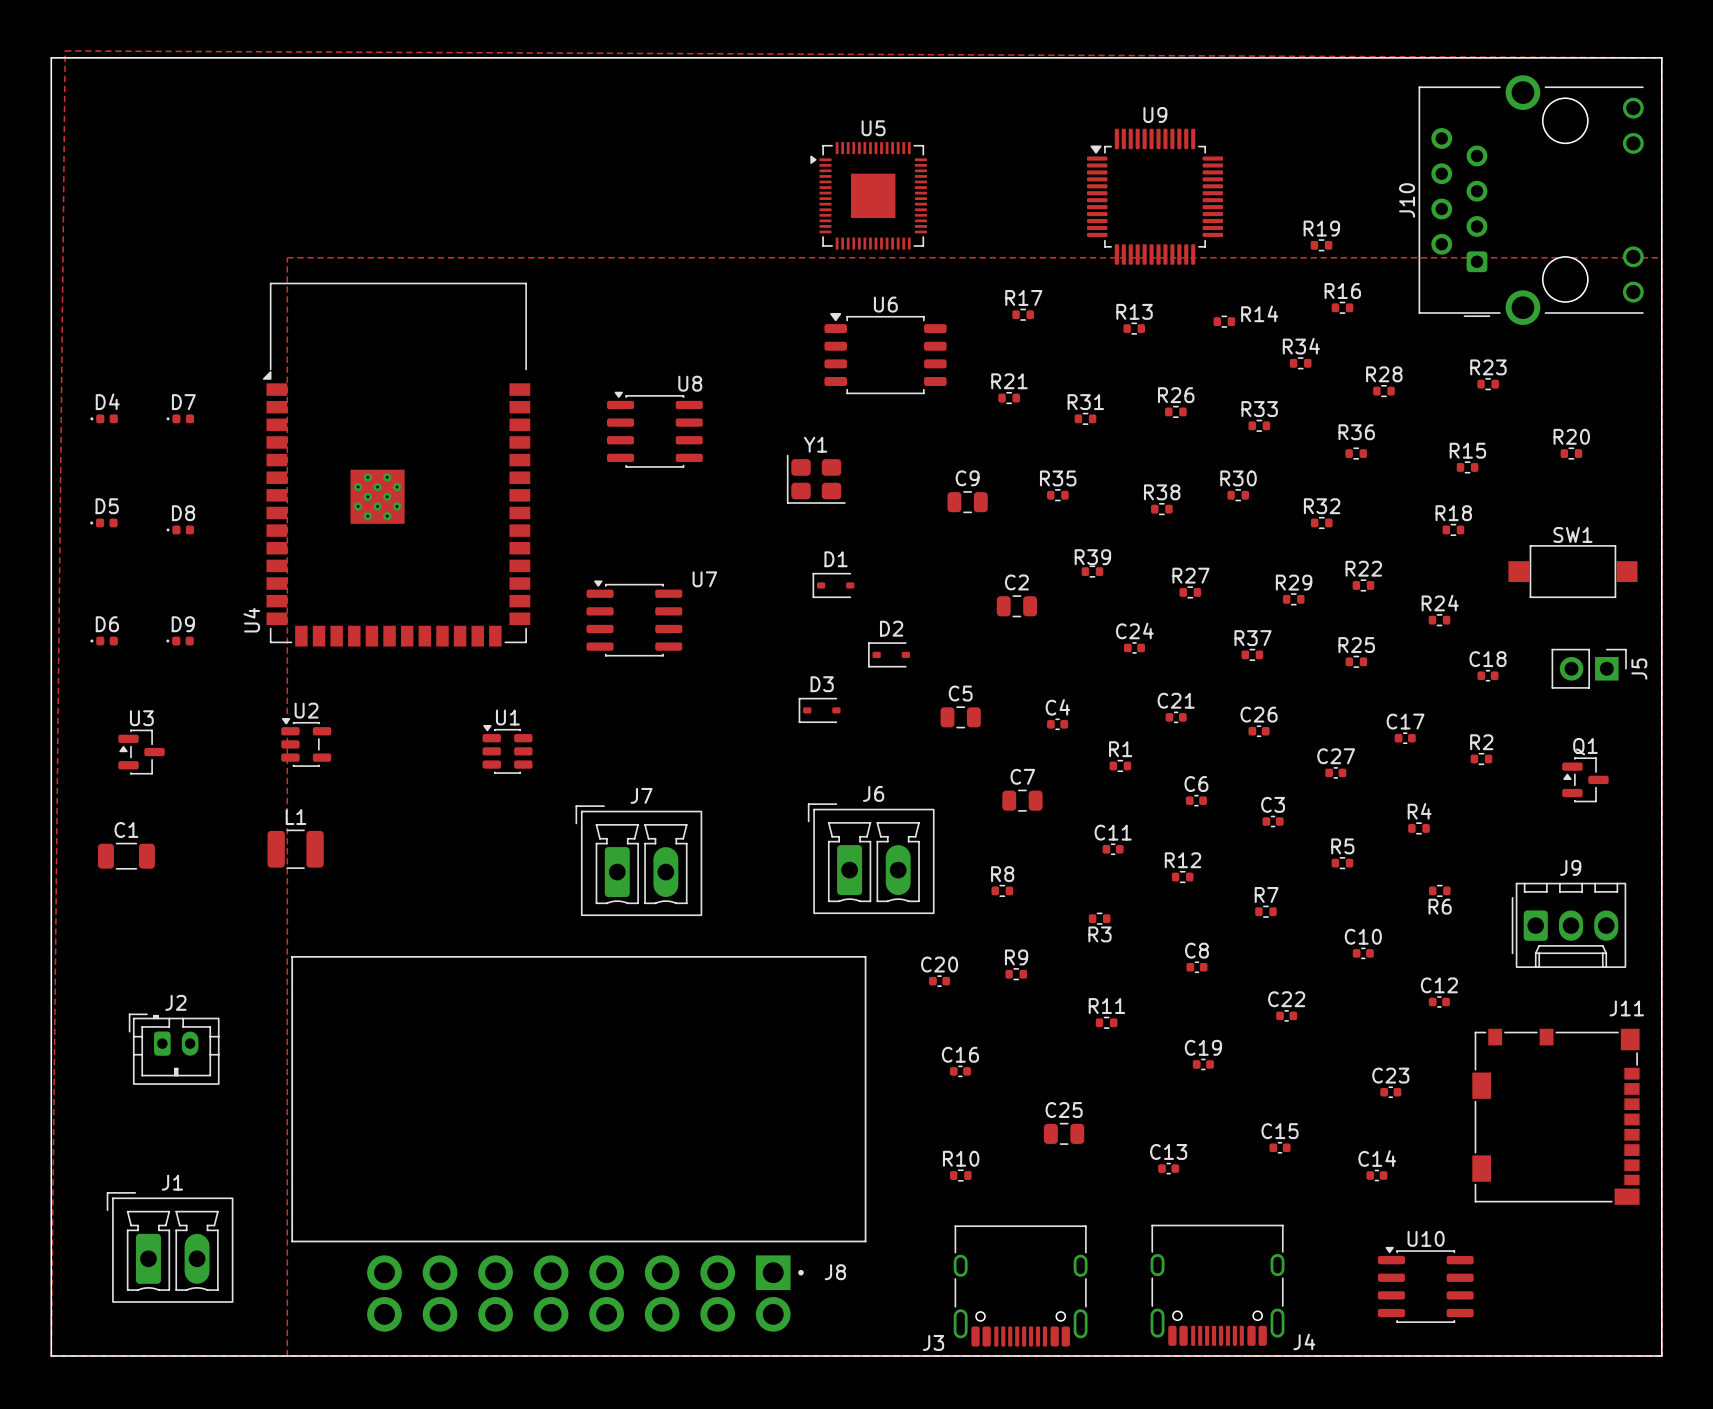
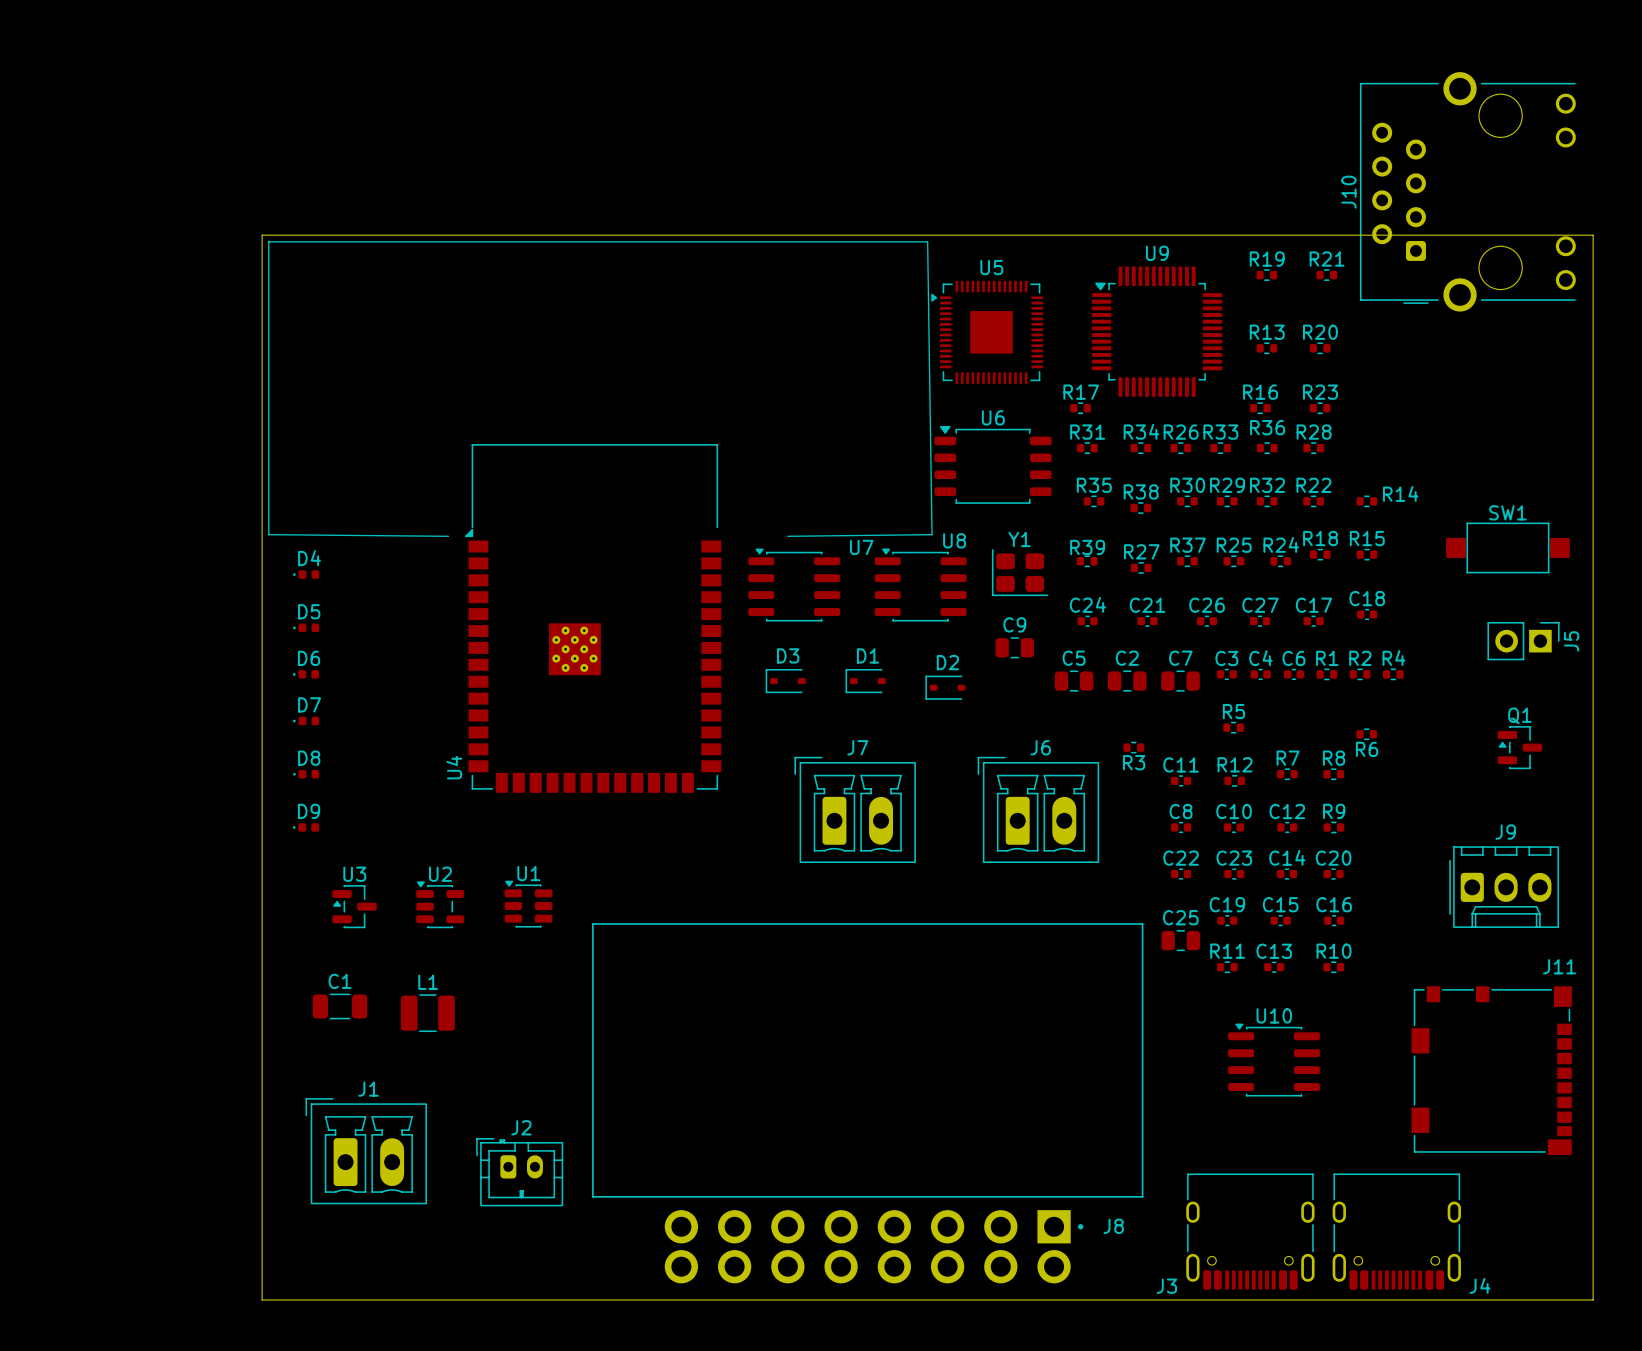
zone outline: (65, 50) (1661, 57) (1661, 1356) (51, 1356) (65, 50) -> none
U5 position: (868, 195) -> (987, 332)
U9 position: (1155, 196) -> (1157, 331)
R19 position: (1321, 245) -> (1266, 275)
board edge: (1661, 245) (1661, 57) (51, 57) (51, 1356) (273, 1356) -> (1593, 235) (262, 235) (262, 1299)
zone outline: (1661, 257) (287, 257) (287, 1356) -> none
R16 position: (1342, 307) -> (1260, 408)
R17 position: (1023, 314) -> (1080, 408)
R14 position: (1224, 321) -> (1366, 501)
R13 position: (1134, 328) -> (1266, 348)
U6 position: (885, 353) -> (993, 464)
R34 position: (1300, 363) -> (1140, 448)
R23 position: (1488, 384) -> (1320, 408)
R28 position: (1383, 391) -> (1313, 448)
R21 position: (1009, 398) -> (1326, 275)
R26 position: (1175, 411) -> (1180, 448)
D4 position: (104, 418) -> (306, 574)
D7 position: (180, 418) -> (306, 720)
R31 position: (1085, 418) -> (1087, 448)
R33 position: (1259, 425) -> (1220, 448)
U8 position: (654, 429) -> (920, 585)
R36 position: (1356, 453) -> (1267, 448)
R20 position: (1571, 453) -> (1320, 348)
U4 position: (396, 464) -> (593, 618)
R15 position: (1467, 467) -> (1366, 554)
Y1 position: (816, 479) -> (1020, 572)
R35 position: (1057, 495) -> (1094, 501)
R30 position: (1238, 495) -> (1187, 501)
C9 position: (967, 502) -> (1014, 647)
R38 position: (1161, 509) -> (1140, 508)
D5 position: (103, 522) -> (306, 627)
D8 position: (180, 529) -> (306, 774)
R18 position: (1453, 529) -> (1320, 554)
line: none -> (448, 536) (268, 534) (268, 241) (927, 241) (932, 534) (787, 536)
R39 position: (1092, 571) -> (1087, 561)
D1 position: (833, 585) -> (865, 681)
R22 position: (1363, 585) -> (1313, 501)
R29 position: (1293, 599) -> (1227, 501)
C2 position: (1016, 606) -> (1127, 681)
U7 position: (634, 618) -> (794, 585)
R24 position: (1439, 620) -> (1280, 561)
D6 position: (104, 641) -> (305, 674)
D9 position: (180, 641) -> (305, 827)
D2 position: (889, 654) -> (945, 687)
R37 position: (1252, 654) -> (1187, 561)
R25 position: (1356, 661) -> (1233, 561)
C18 position: (1487, 675) -> (1367, 614)
C5 position: (960, 717) -> (1074, 681)
C21 position: (1176, 717) -> (1147, 621)
C4 position: (1057, 724) -> (1260, 674)
C26 position: (1259, 731) -> (1207, 621)
C17 position: (1405, 738) -> (1313, 621)
U2 position: (306, 742) -> (440, 904)
U1 position: (507, 749) -> (528, 904)
U3 position: (141, 752) -> (354, 906)
R2 position: (1481, 759) -> (1360, 674)
R1 position: (1120, 765) -> (1326, 674)
C27 position: (1335, 772) -> (1260, 621)
C7 position: (1022, 800) -> (1180, 681)
C6 position: (1196, 800) -> (1293, 674)
J6 footprint: [807, 803, 935, 915] -> [977, 756, 1100, 864]
J7 footprint: [575, 805, 703, 917] -> [794, 756, 916, 864]
C3 position: (1273, 821) -> (1226, 674)
R4 position: (1418, 828) -> (1393, 674)
L1 position: (295, 849) -> (427, 1013)
C11 position: (1113, 849) -> (1181, 780)
C1 position: (126, 856) -> (339, 1006)
R5 position: (1342, 863) -> (1233, 727)
R12 position: (1182, 877) -> (1234, 780)
R8 position: (1002, 890) -> (1333, 774)
R6 position: (1439, 890) -> (1366, 734)
R7 position: (1265, 911) -> (1287, 774)
R3 position: (1099, 918) -> (1133, 747)
C10 position: (1363, 953) -> (1234, 827)
C8 position: (1196, 967) -> (1181, 827)
R9 position: (1016, 974) -> (1333, 827)
C20 position: (939, 981) -> (1333, 874)
C12 position: (1439, 1001) -> (1287, 827)
C22 position: (1286, 1015) -> (1181, 874)
R11 position: (1106, 1022) -> (1227, 967)
J2 position: (174, 1049) -> (519, 1172)
C19 position: (1203, 1064) -> (1227, 920)
C16 position: (960, 1071) -> (1334, 920)
C23 position: (1390, 1092) -> (1234, 874)
C25 position: (1064, 1133) -> (1180, 940)
J8 position: (578, 1143) -> (867, 1103)
C15 position: (1280, 1147) -> (1280, 920)
C13 position: (1168, 1168) -> (1274, 967)
R10 position: (960, 1175) -> (1333, 967)
C14 position: (1376, 1175) -> (1287, 874)
J1 footprint: [106, 1192, 234, 1303] -> [305, 1098, 428, 1205]
U10 position: (1425, 1284) -> (1274, 1060)
J3 position: (1020, 1285) -> (1250, 1231)
J4 position: (1217, 1285) -> (1396, 1231)

